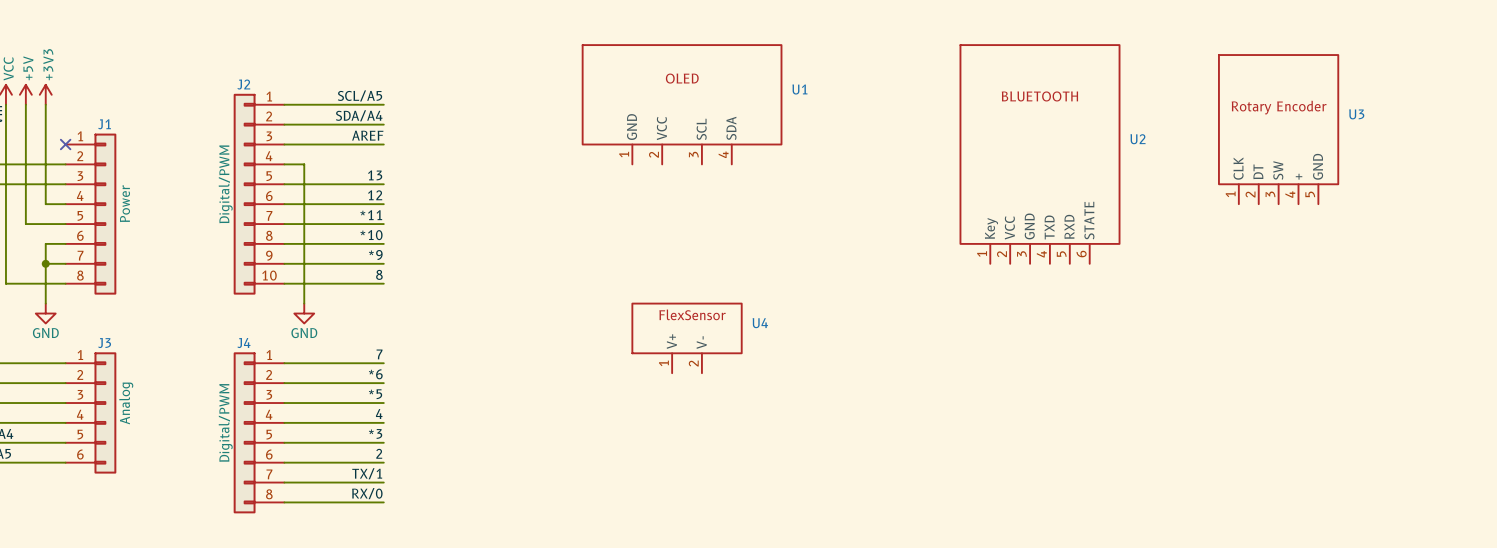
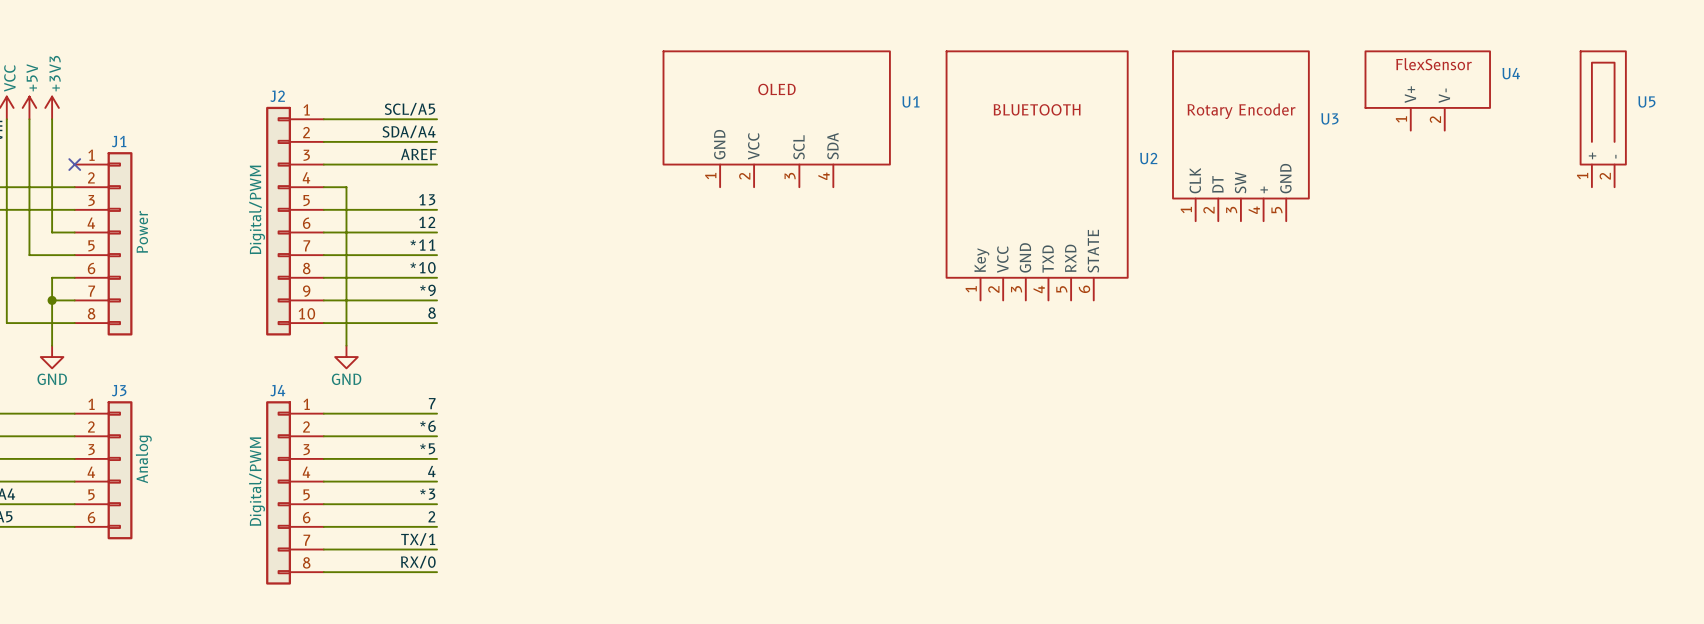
U5: none -> (1603, 119)
U3 position: (1278, 129) -> (1240, 136)
U2 position: (1039, 154) -> (1037, 175)
U4 position: (687, 338) -> (1427, 90)

